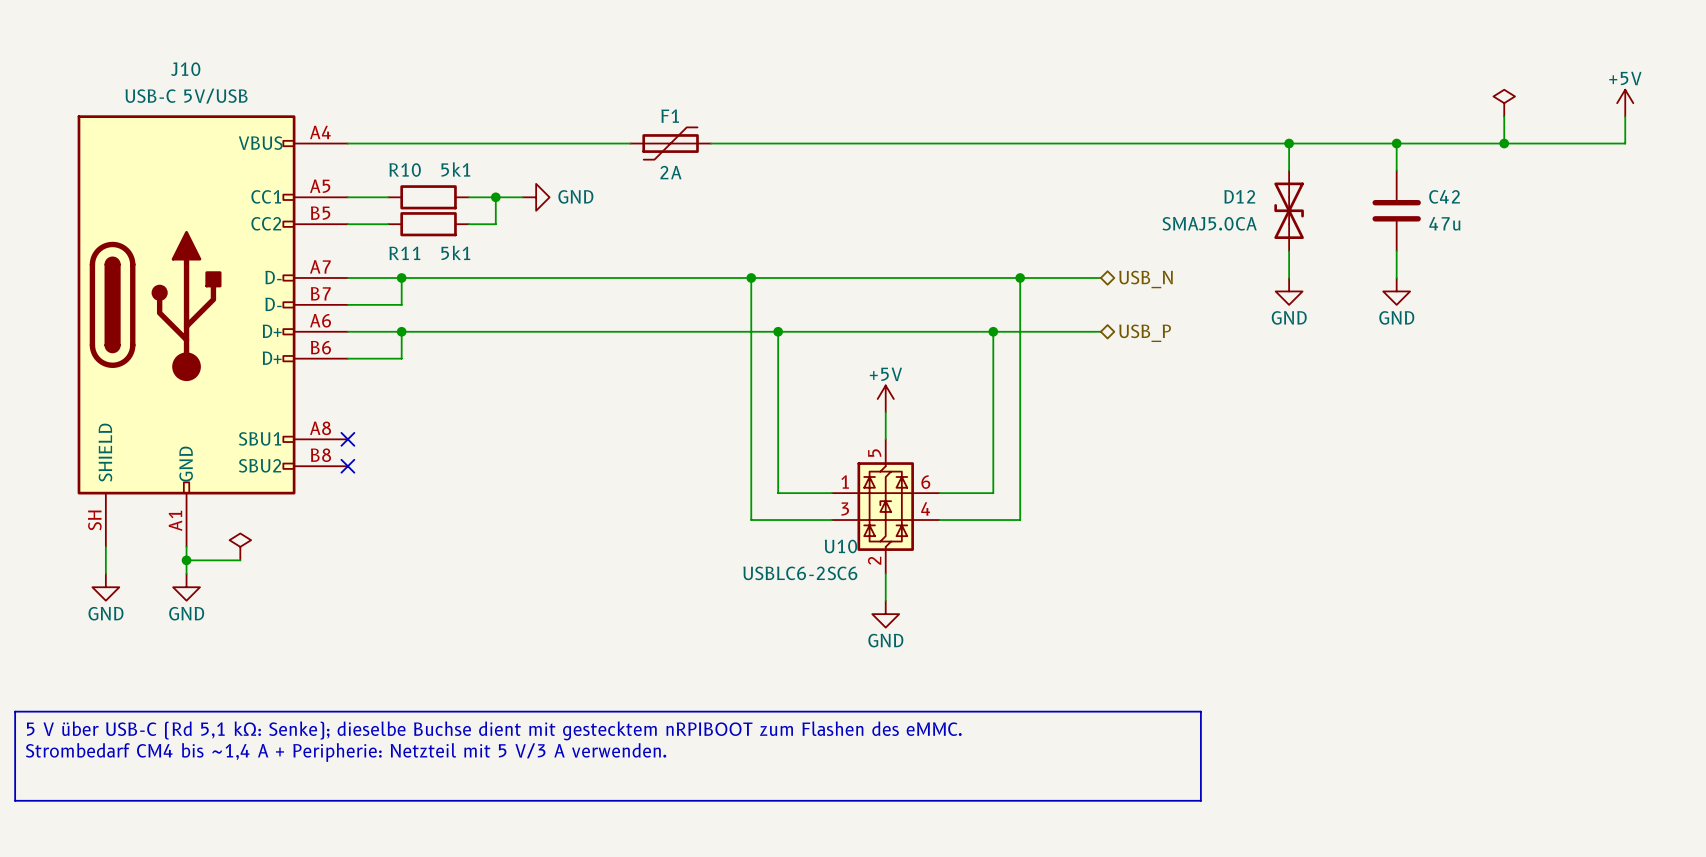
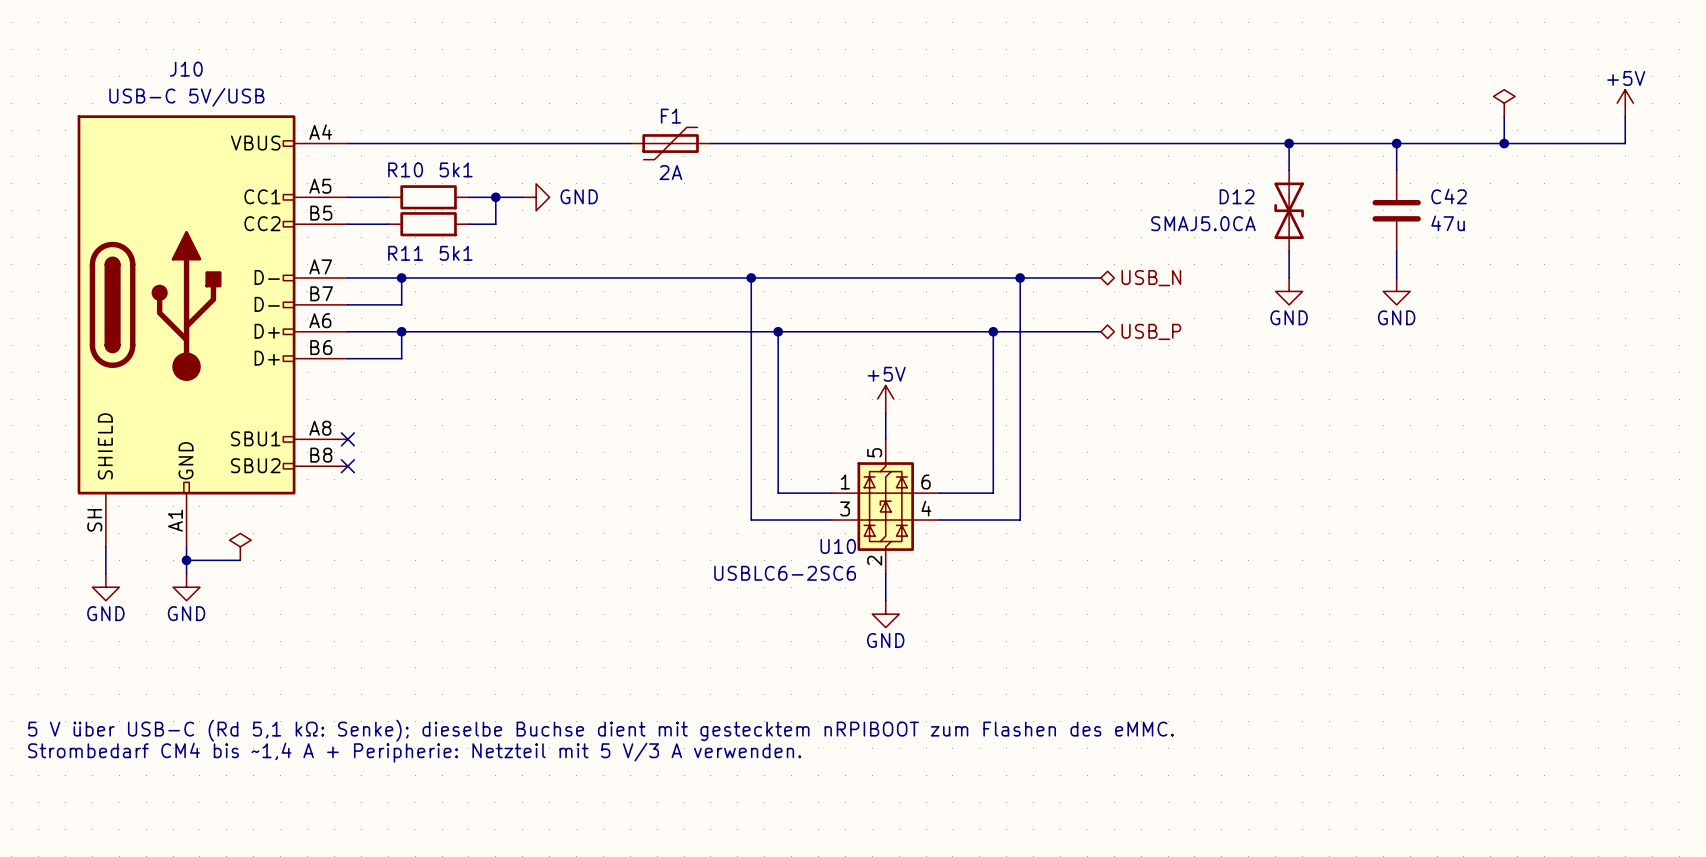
line: (15, 711) (1200, 711) (1200, 800) (15, 800) (15, 711) -> none

